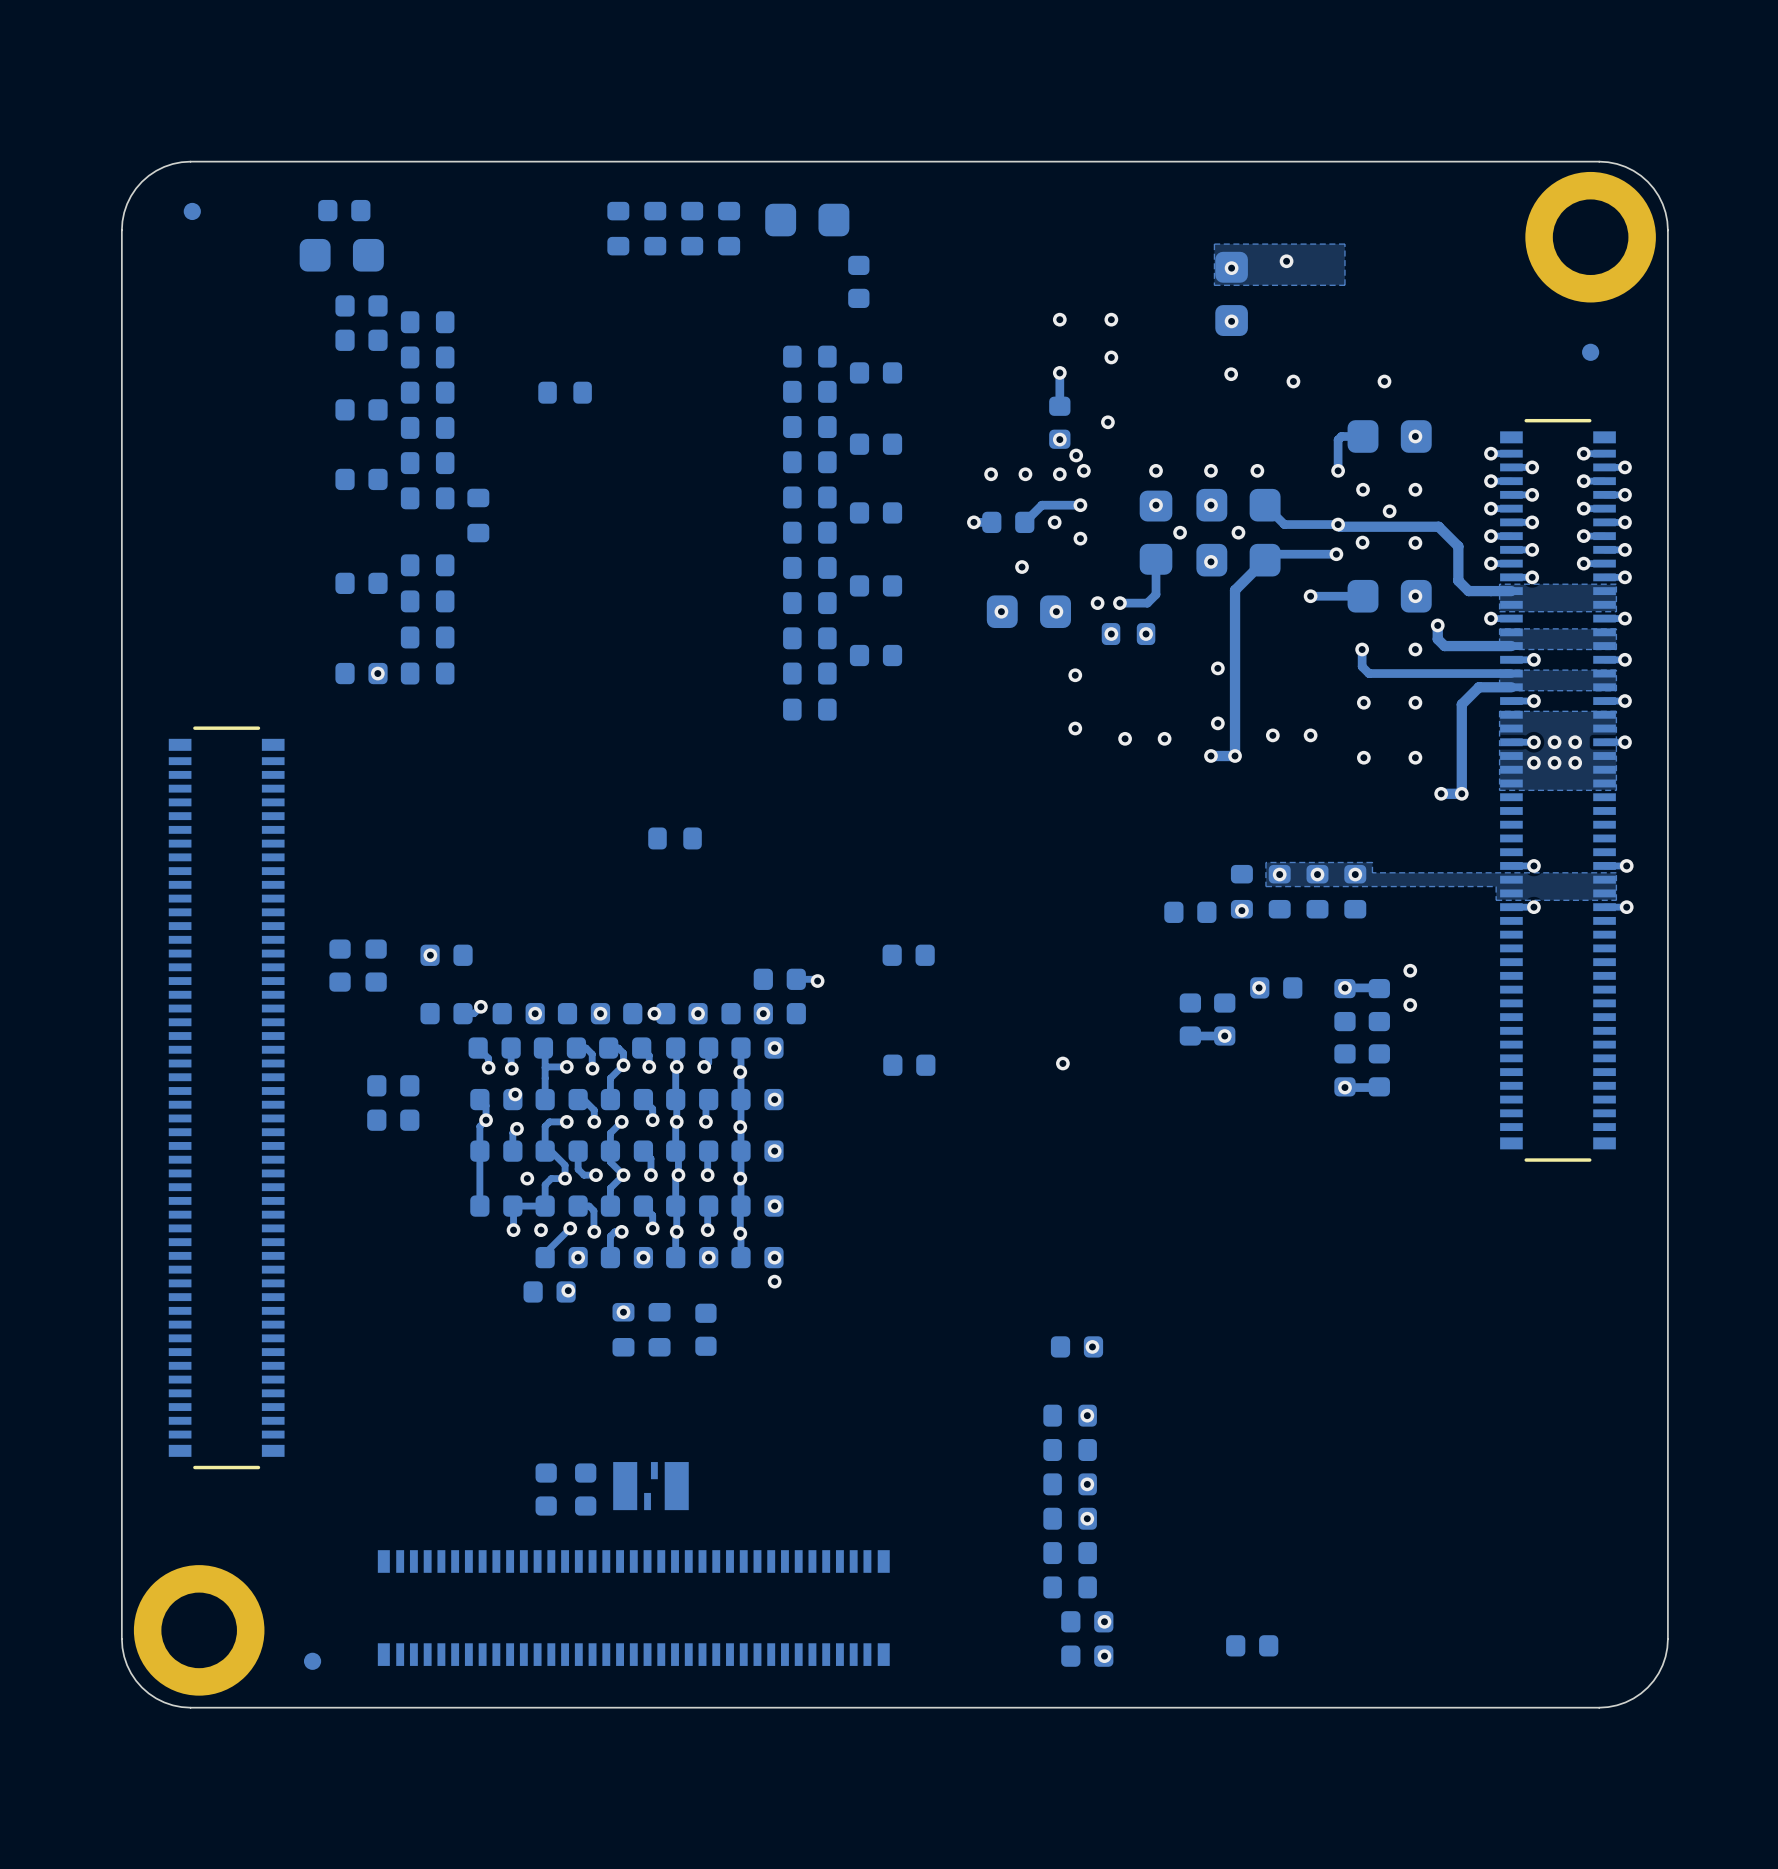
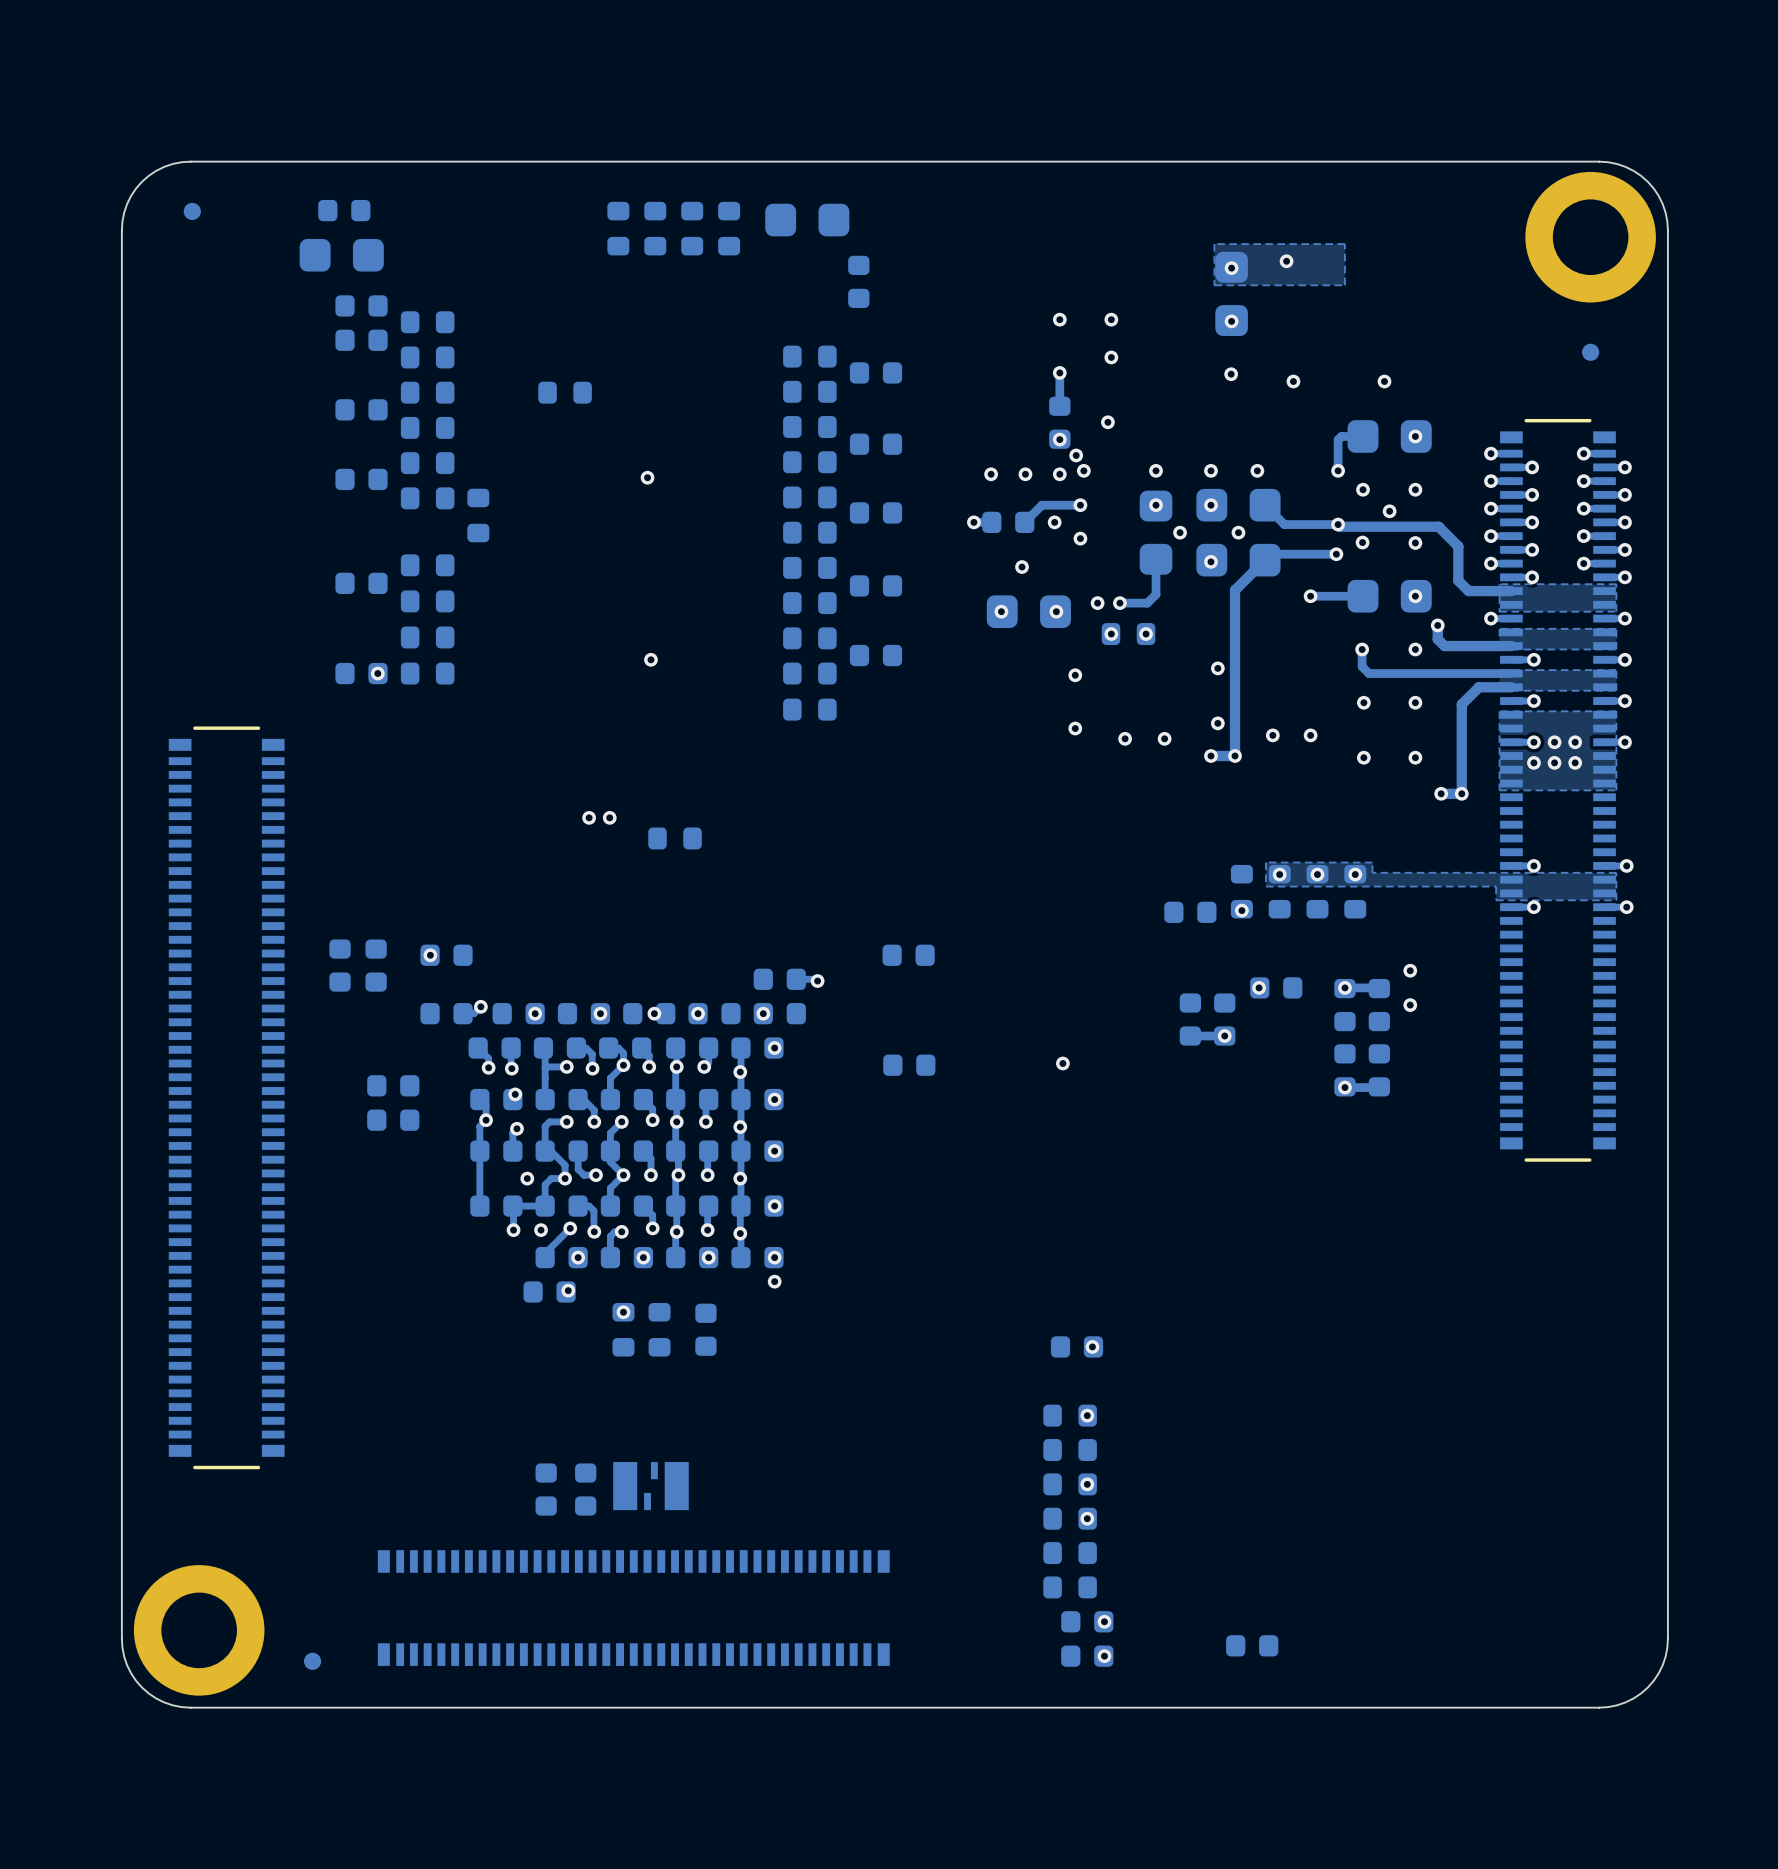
via: none -> (647, 477)
via: none -> (650, 659)
via: none -> (589, 817)
via: none -> (609, 817)

